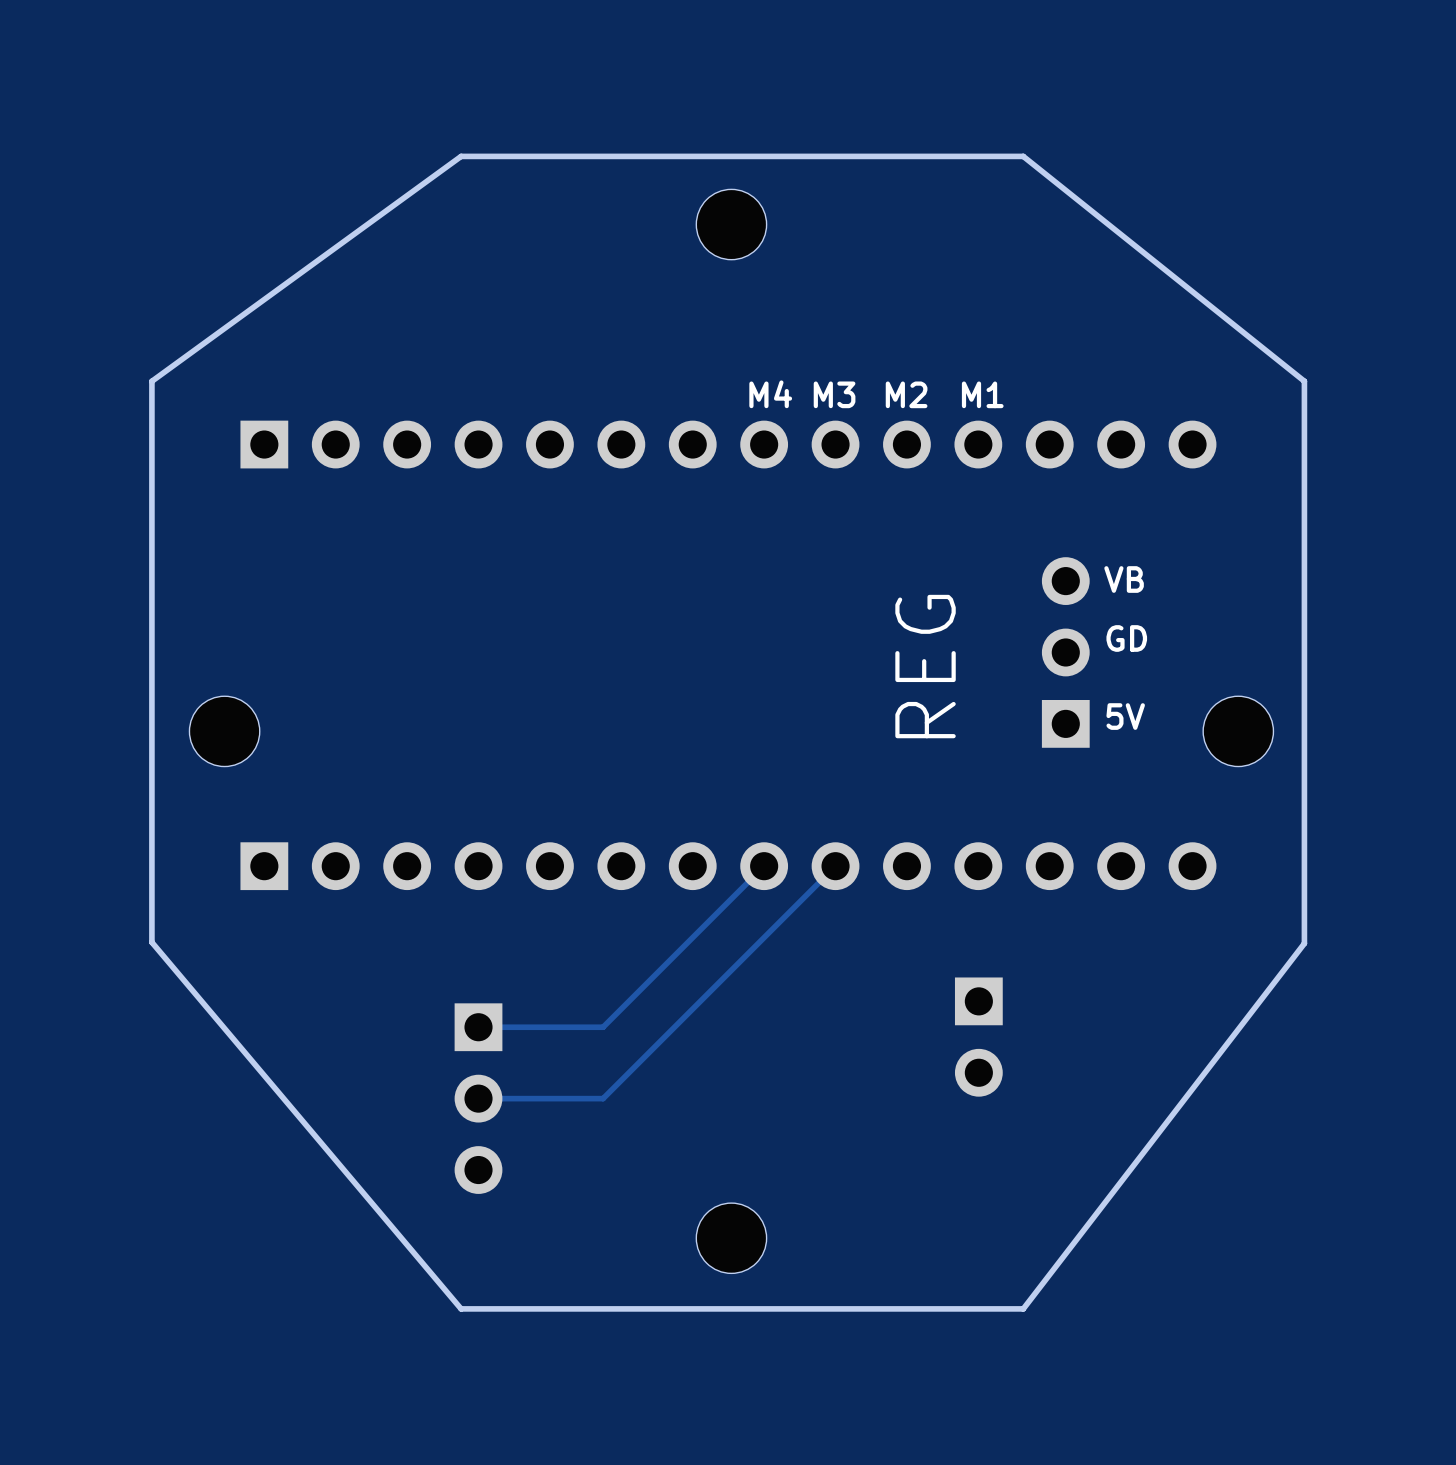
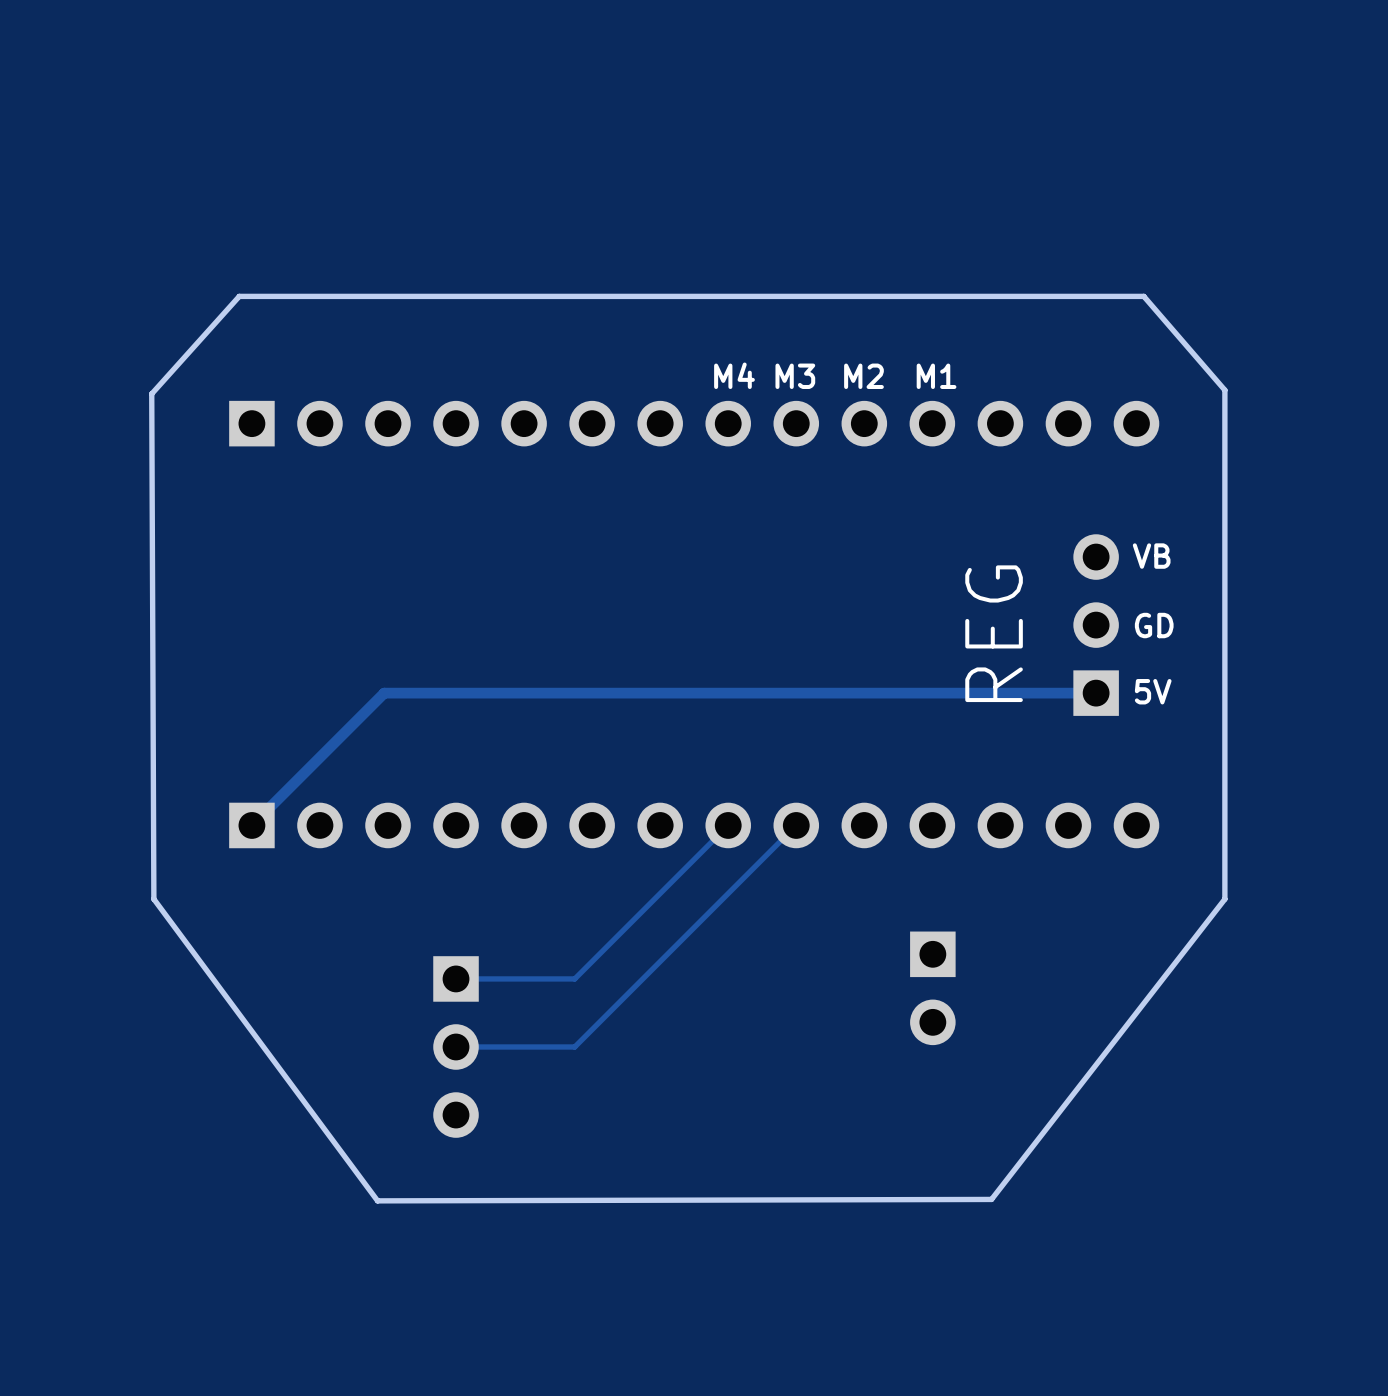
board edge: (1023, 156) (461, 156) (151, 381) (151, 942) (461, 1308) (1023, 1308) (1304, 943) (1304, 381) (1023, 156) -> (1143, 296) (1224, 390) (1224, 899) (991, 1199) (377, 1200) (153, 899) (151, 393) (239, 296) (1143, 296)
part: (731, 224) -> none
text position: VB (1124, 579) -> VB (1151, 556)
text position: GD (1126, 638) -> GD (1154, 625)
part position: (1065, 652) -> (1096, 625)
text position: REG (925, 666) -> REG (994, 633)
text position: 5V (1125, 716) -> 5V (1153, 691)
track: none -> (1096, 693) (384, 693) (251, 825)
part: (224, 731) -> none
part: (1238, 731) -> none
part: (731, 1238) -> none

